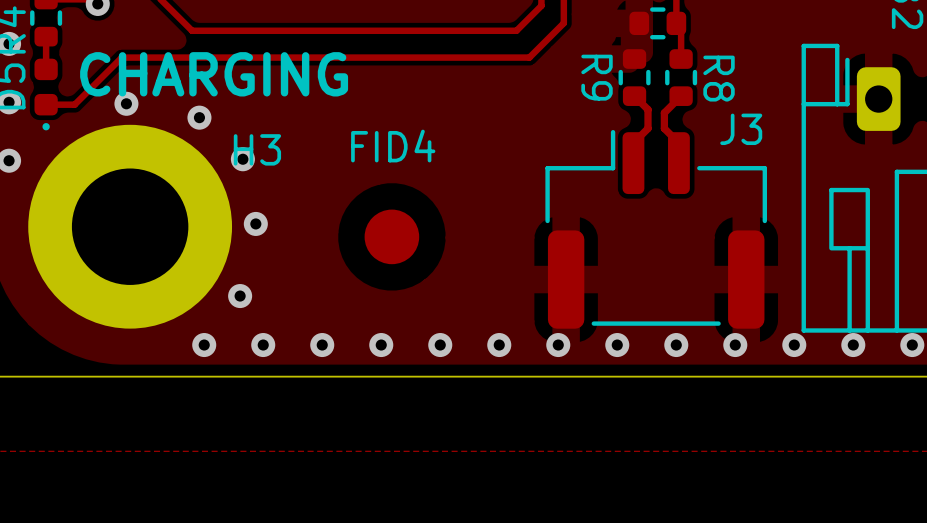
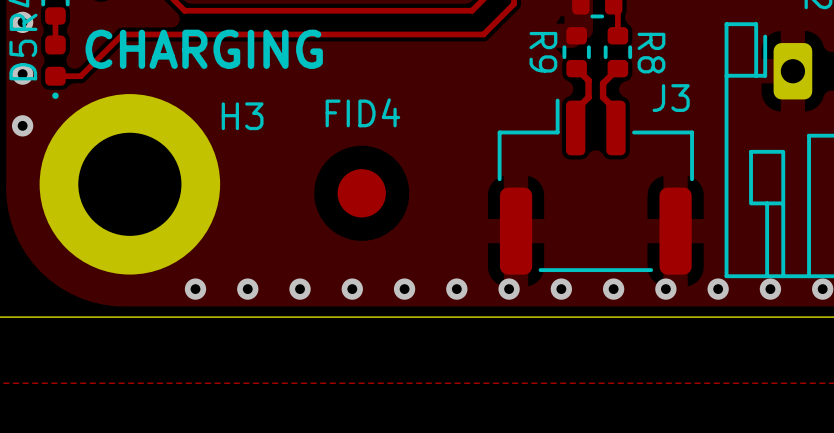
via: (126, 103) -> none
via: (199, 117) -> none
via: (242, 159) -> none
via: (255, 223) -> none
via: (240, 296) -> none

